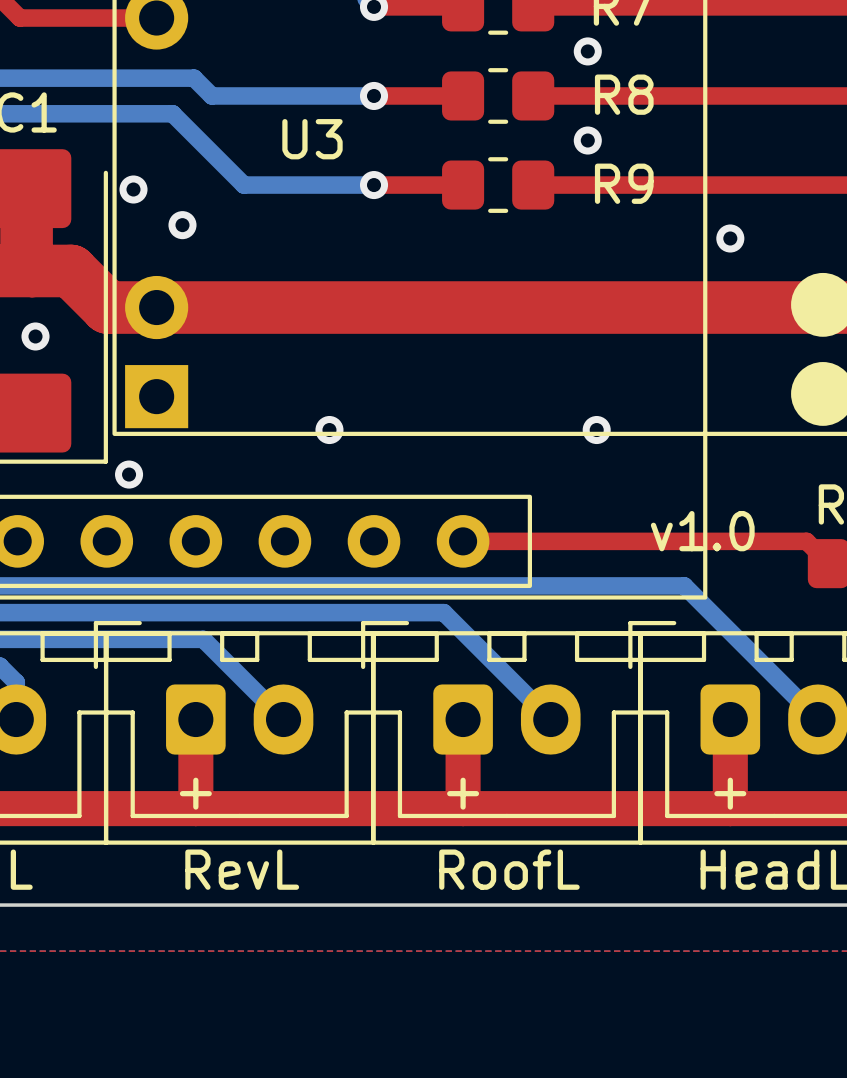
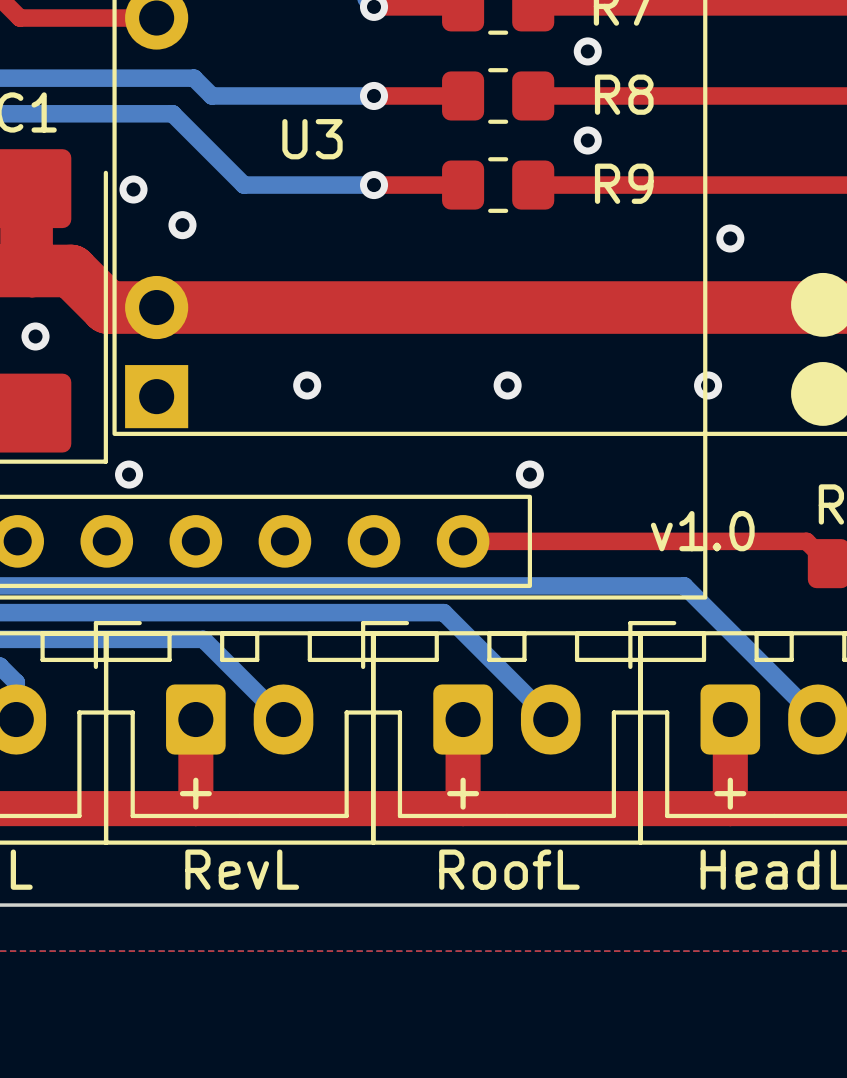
via: none -> (507, 385)
via: none -> (708, 385)
via position: (329, 430) -> (307, 385)
via: (596, 430) -> none
via: none -> (529, 474)

